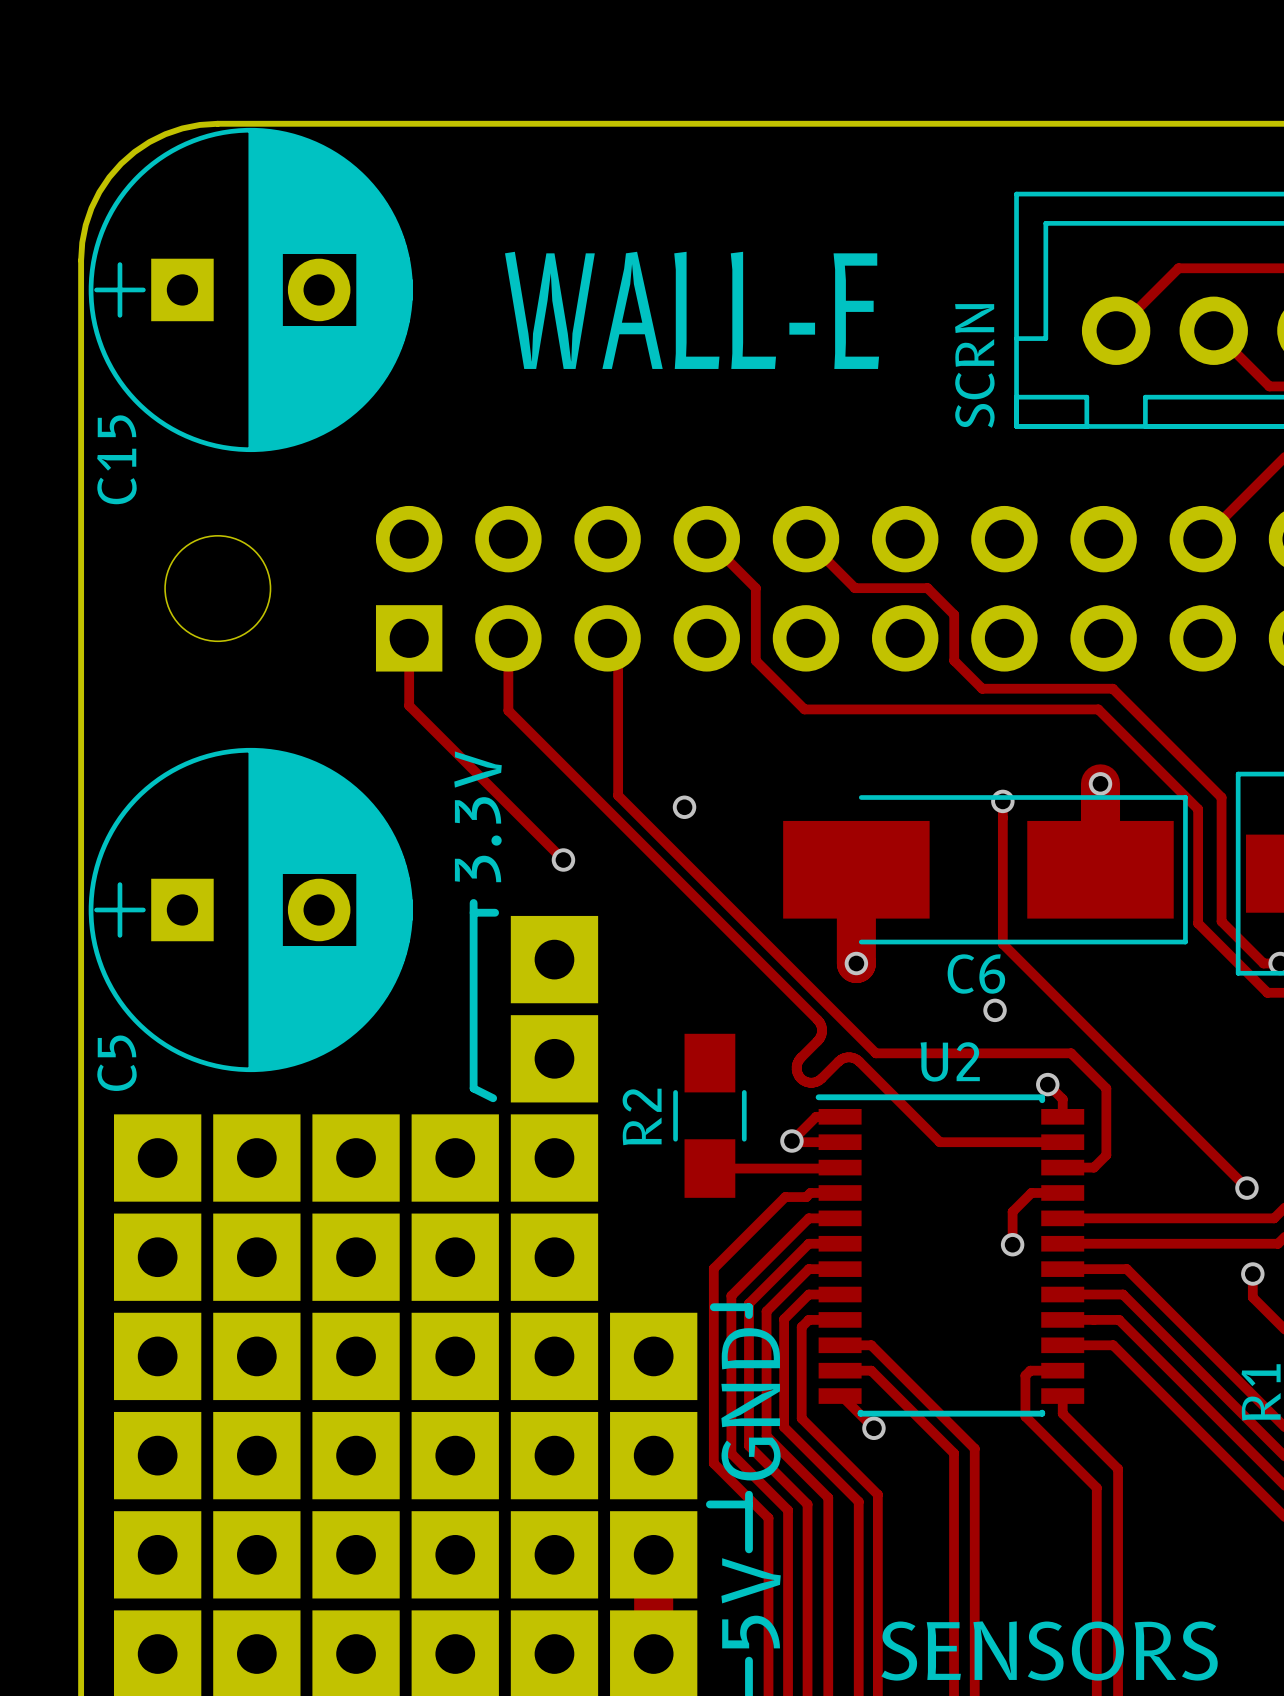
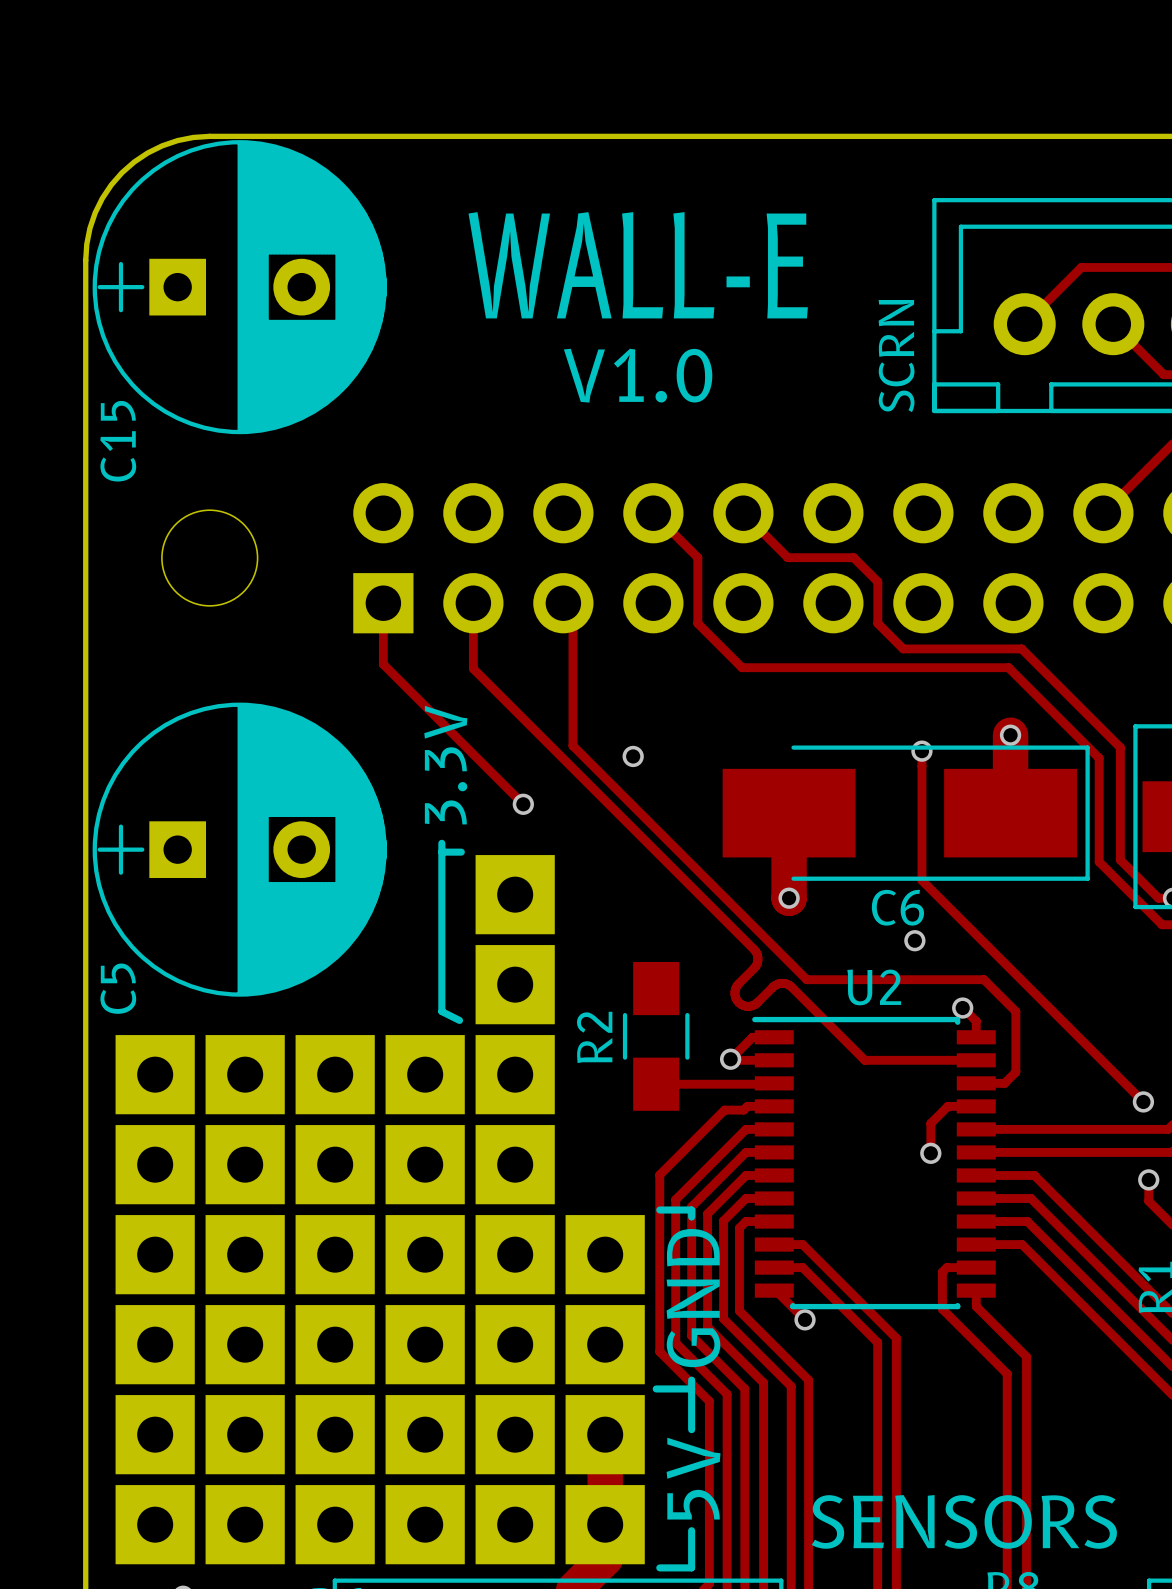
text position: WALL-E (692, 310) -> WALL-E (638, 265)
text: none -> V1.0 (638, 375)

